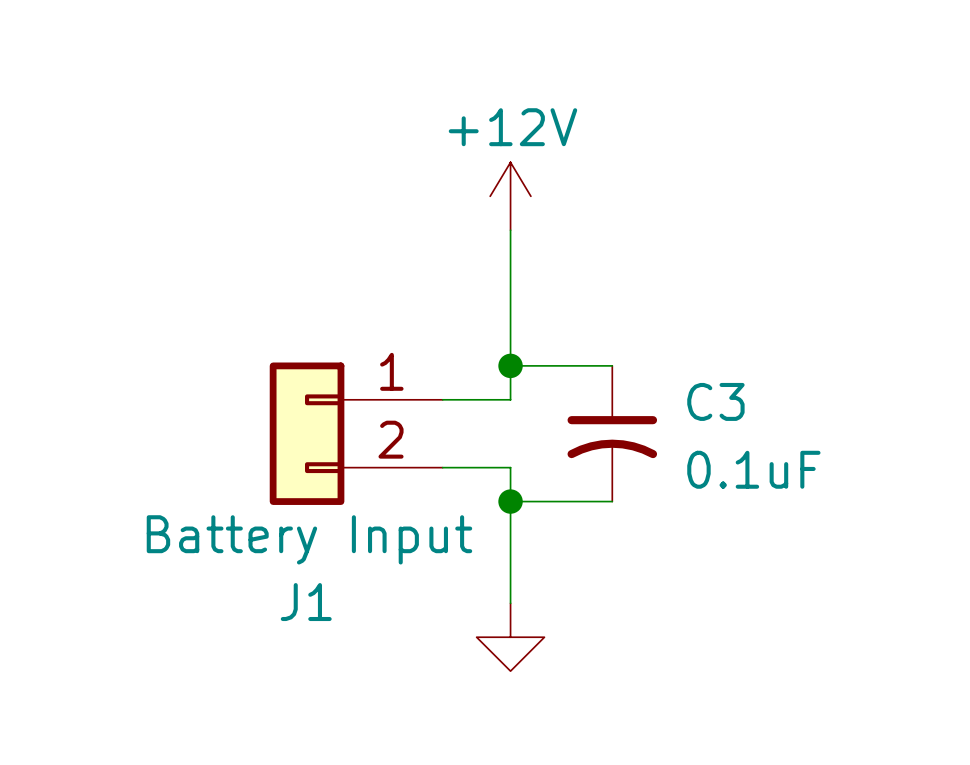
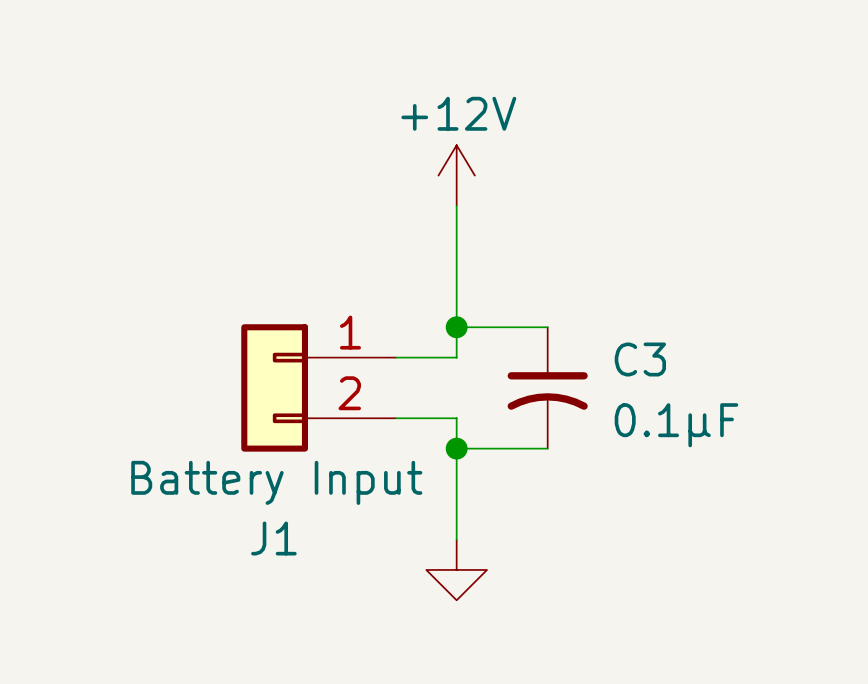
C3 value: 0.1uF (753, 469) -> 0.1µF (676, 425)

